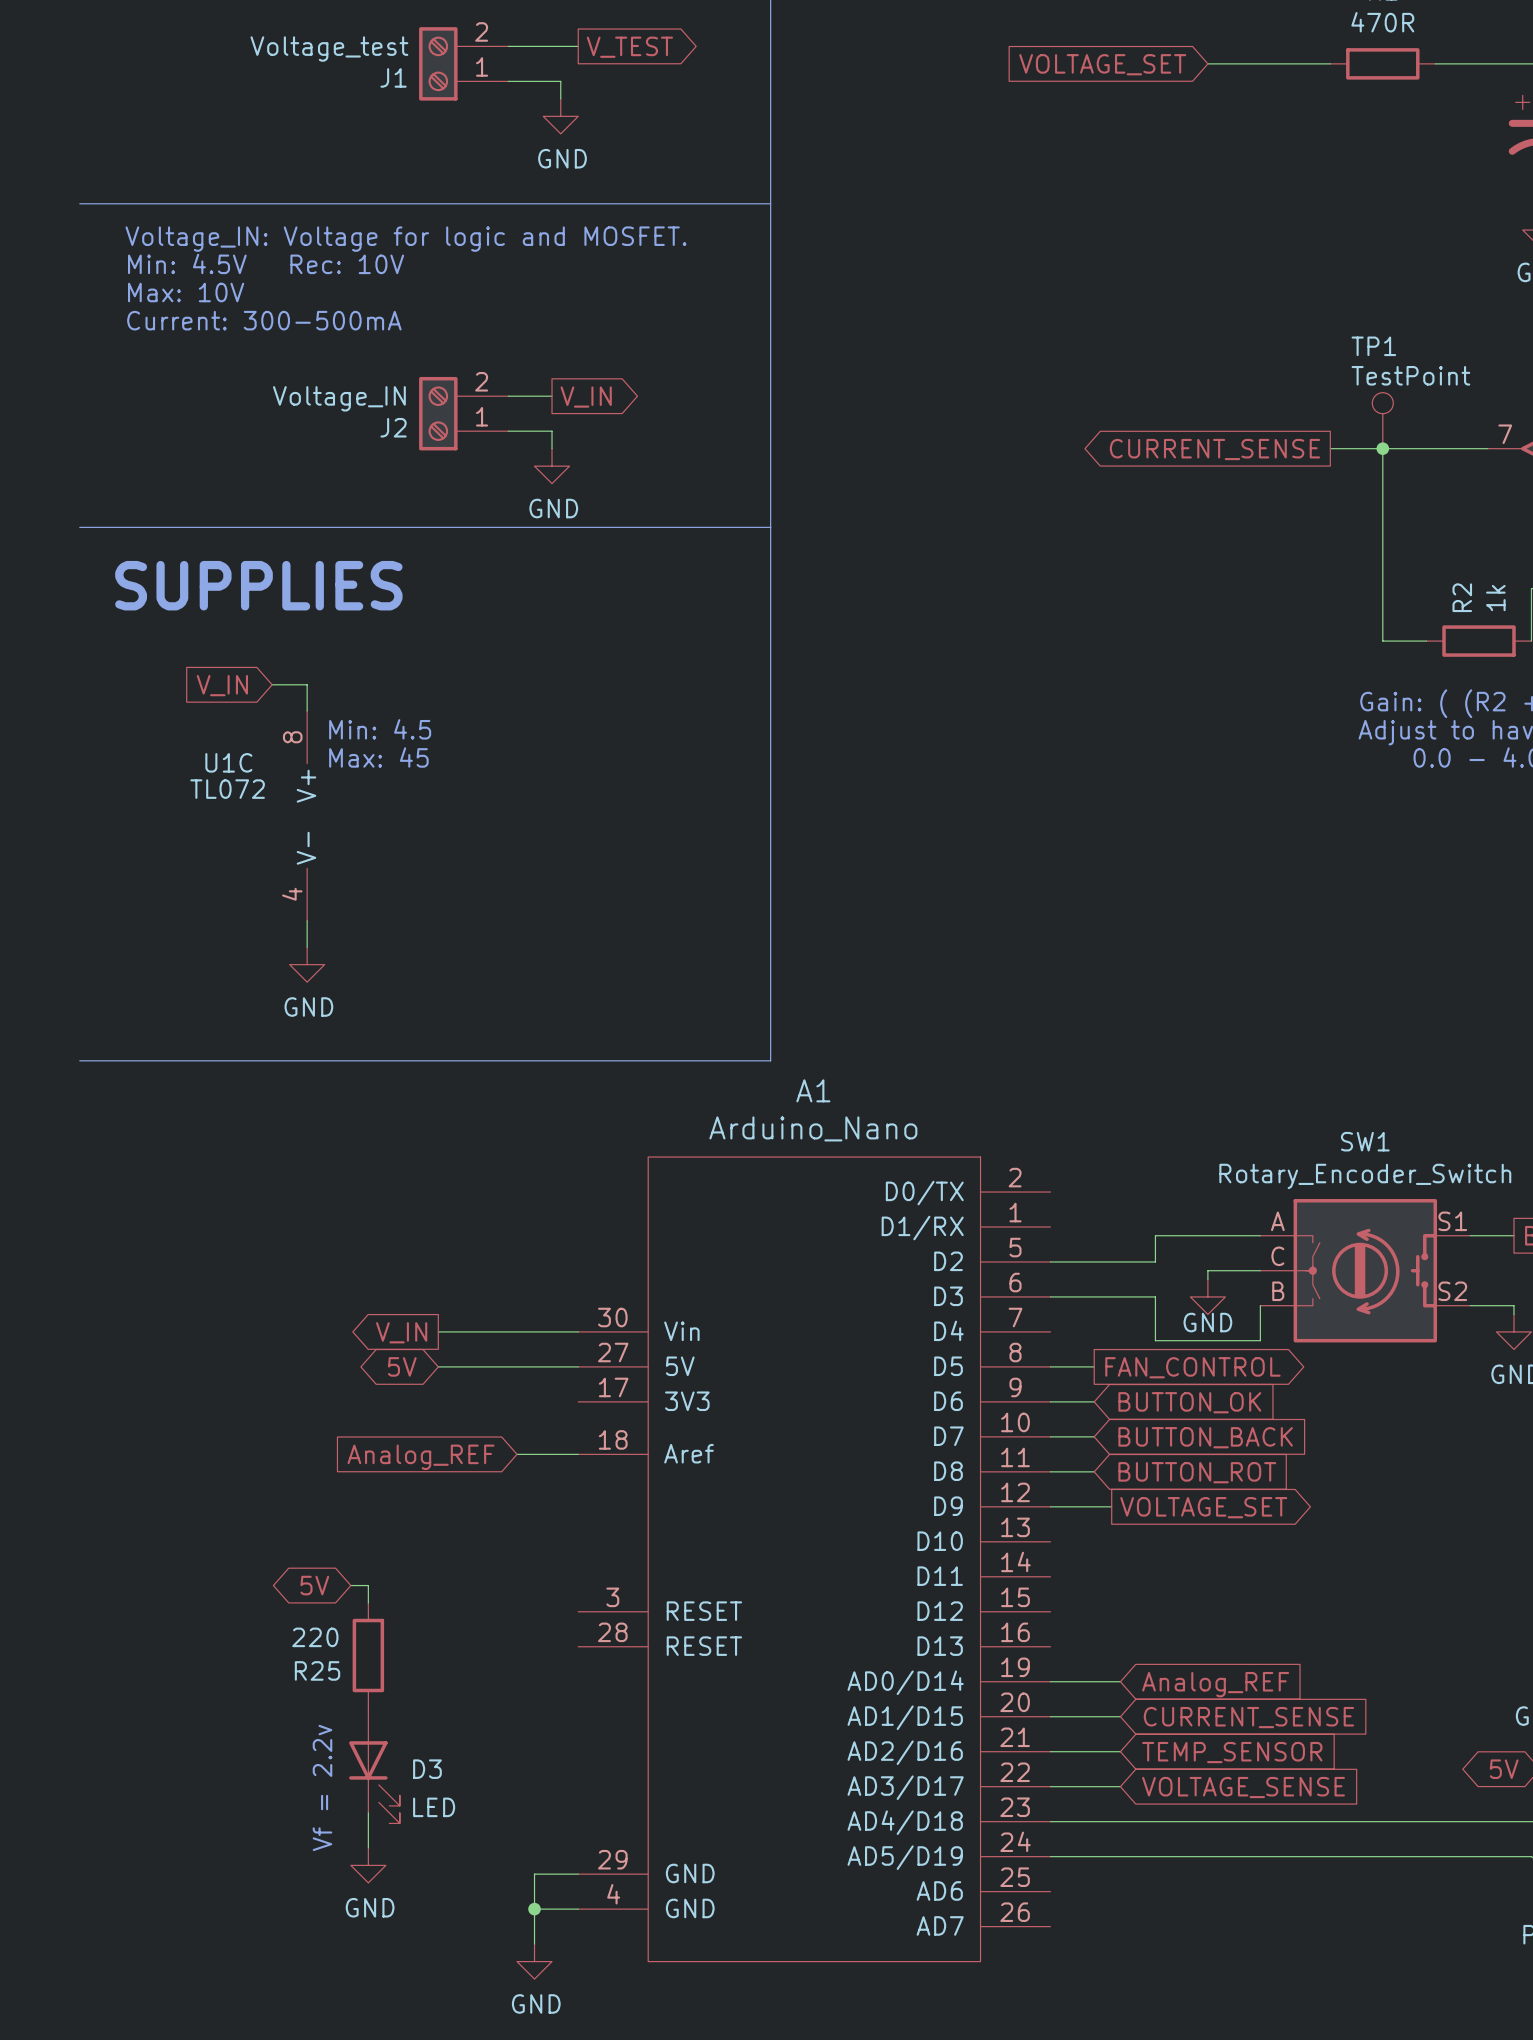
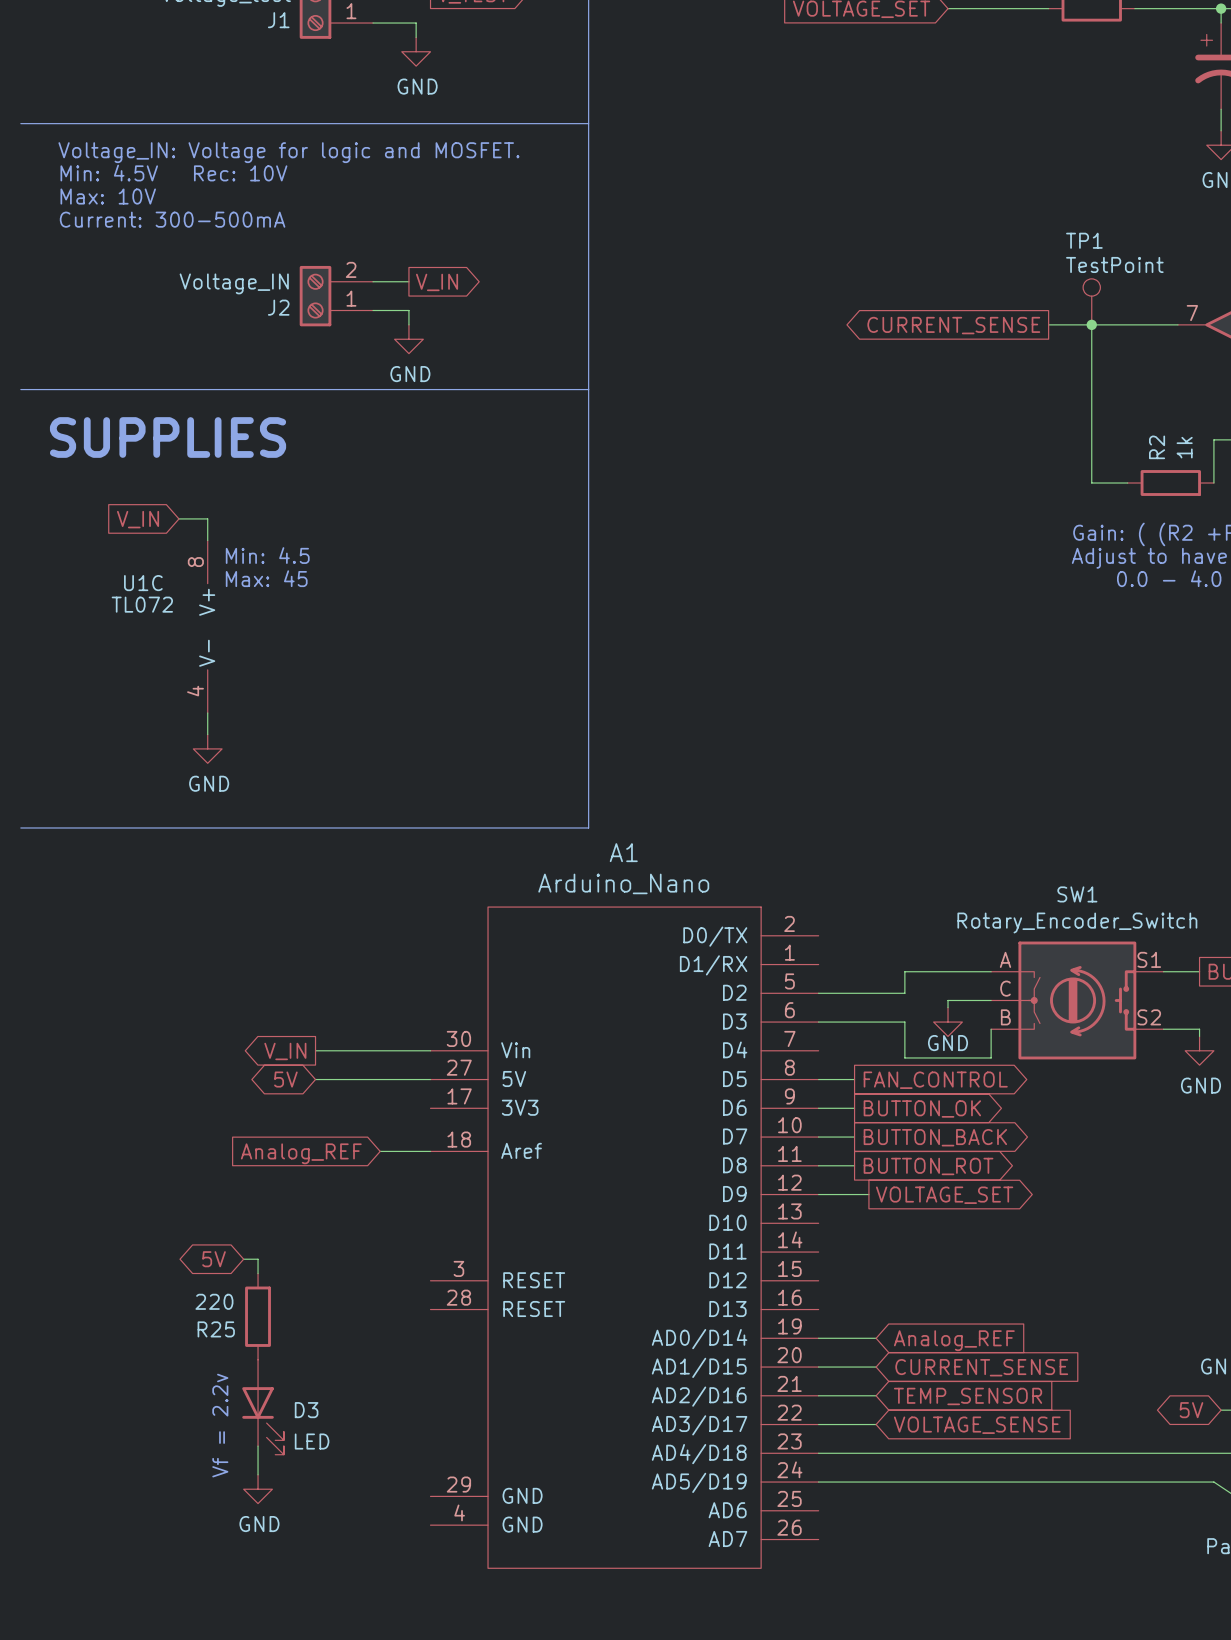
global label shape: input (1189, 1402) -> output (922, 1108)
global label shape: input (1205, 1437) -> output (935, 1137)
global label shape: input (1197, 1472) -> output (928, 1166)
wire: (578, 1874) (534, 1874) (534, 1944) -> none
wire: (534, 1909) (578, 1909) -> none
junction: (534, 1909) -> none
power symbol: GND (534, 1961) -> none

